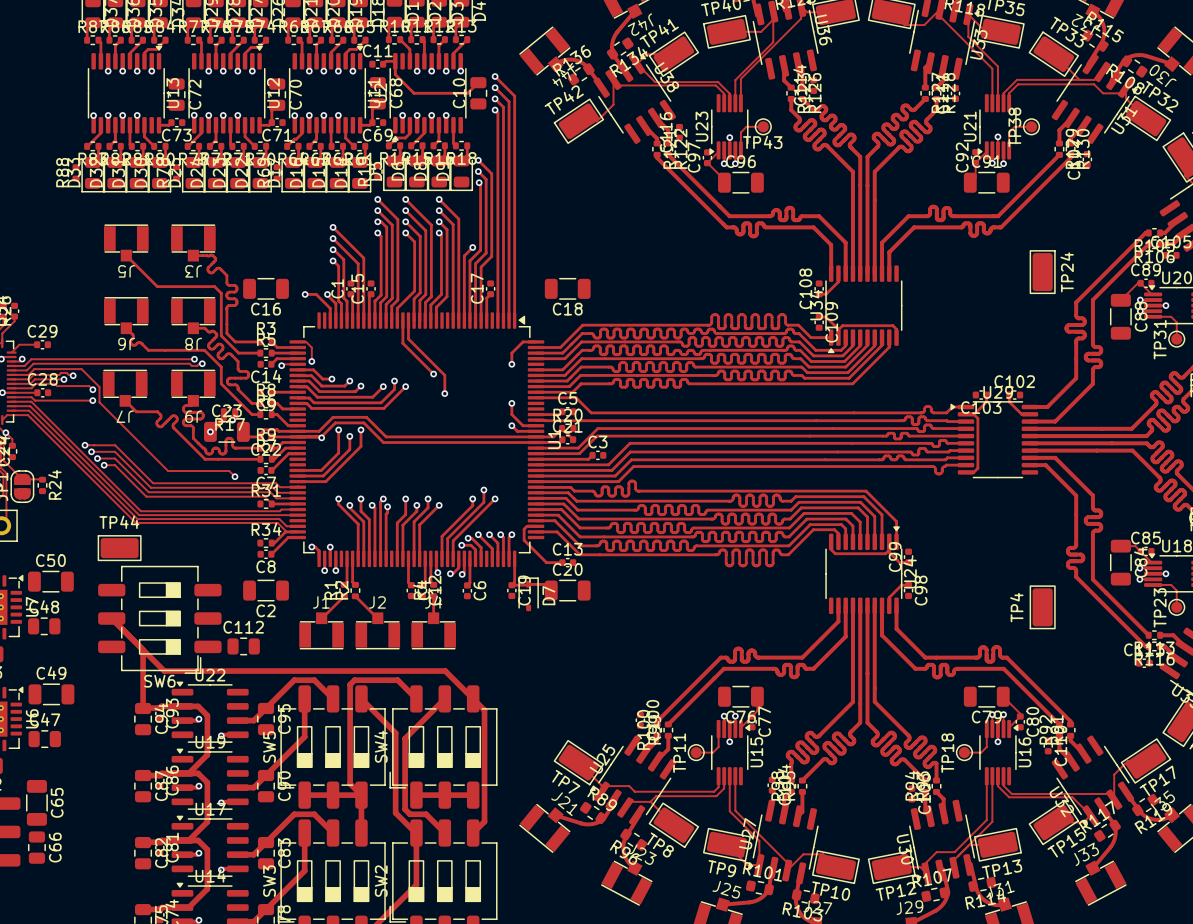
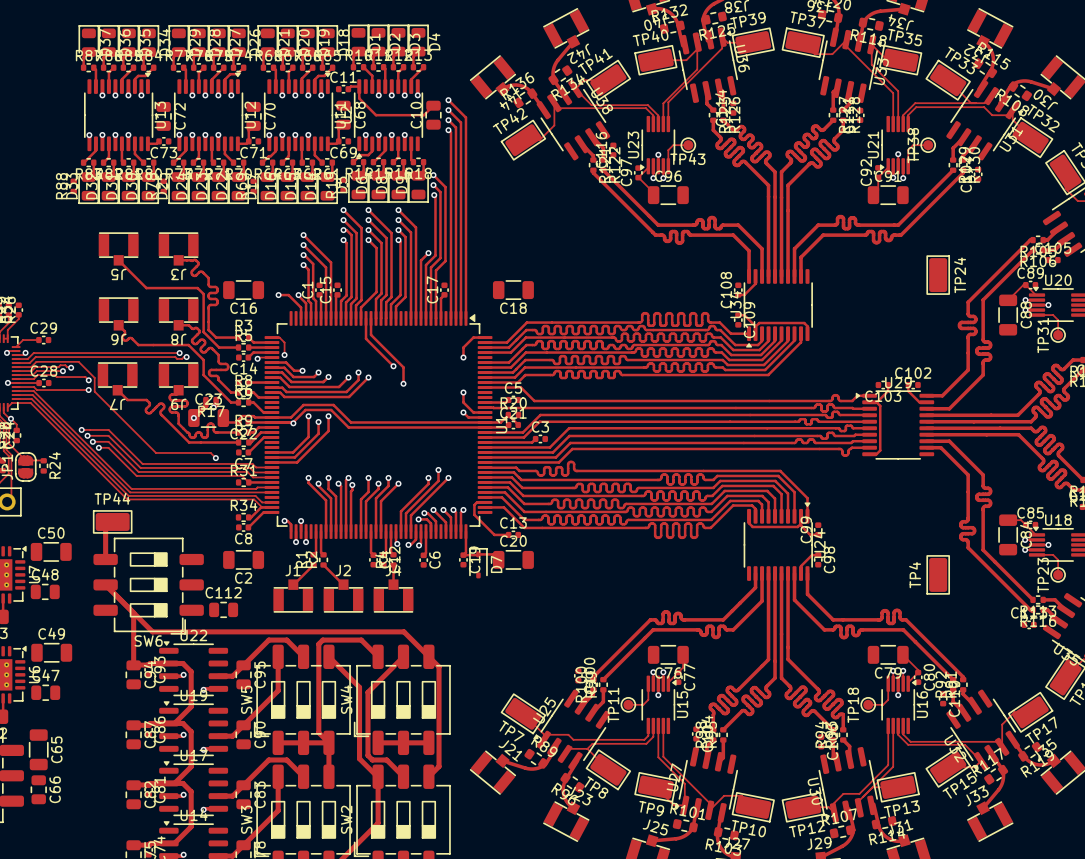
track: none -> (112, 521) (105, 528) (105, 559)

